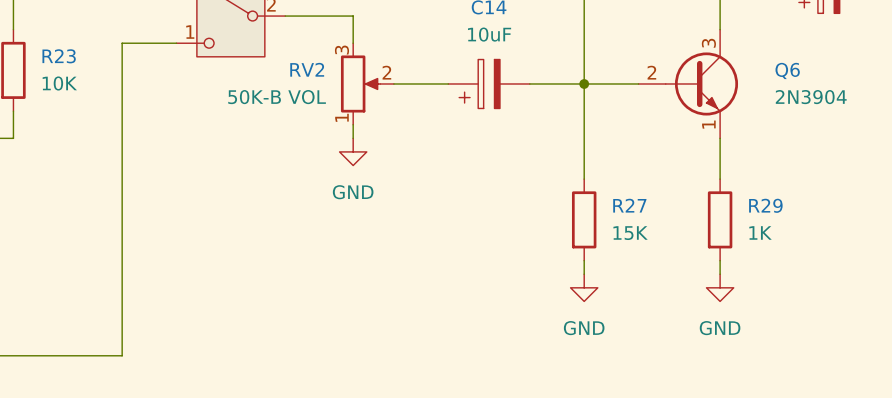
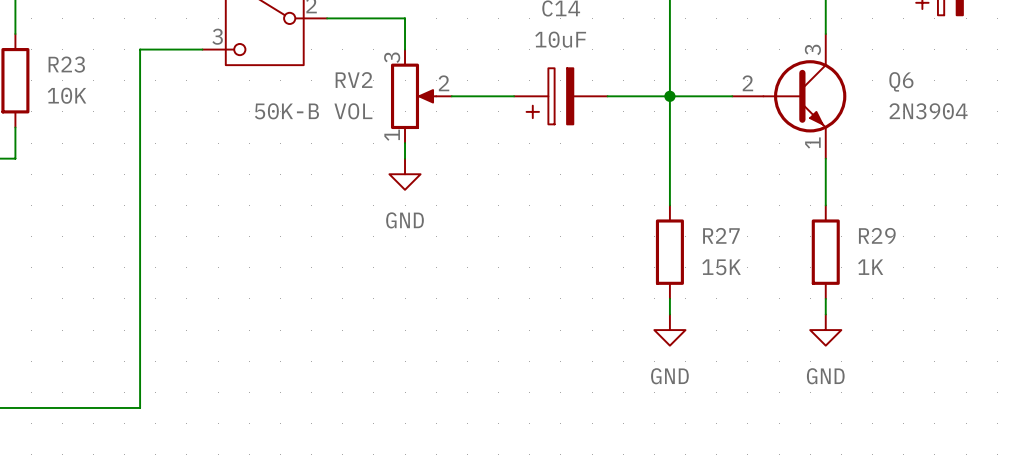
part pin number: 1 (190, 32) -> 3 (217, 36)

